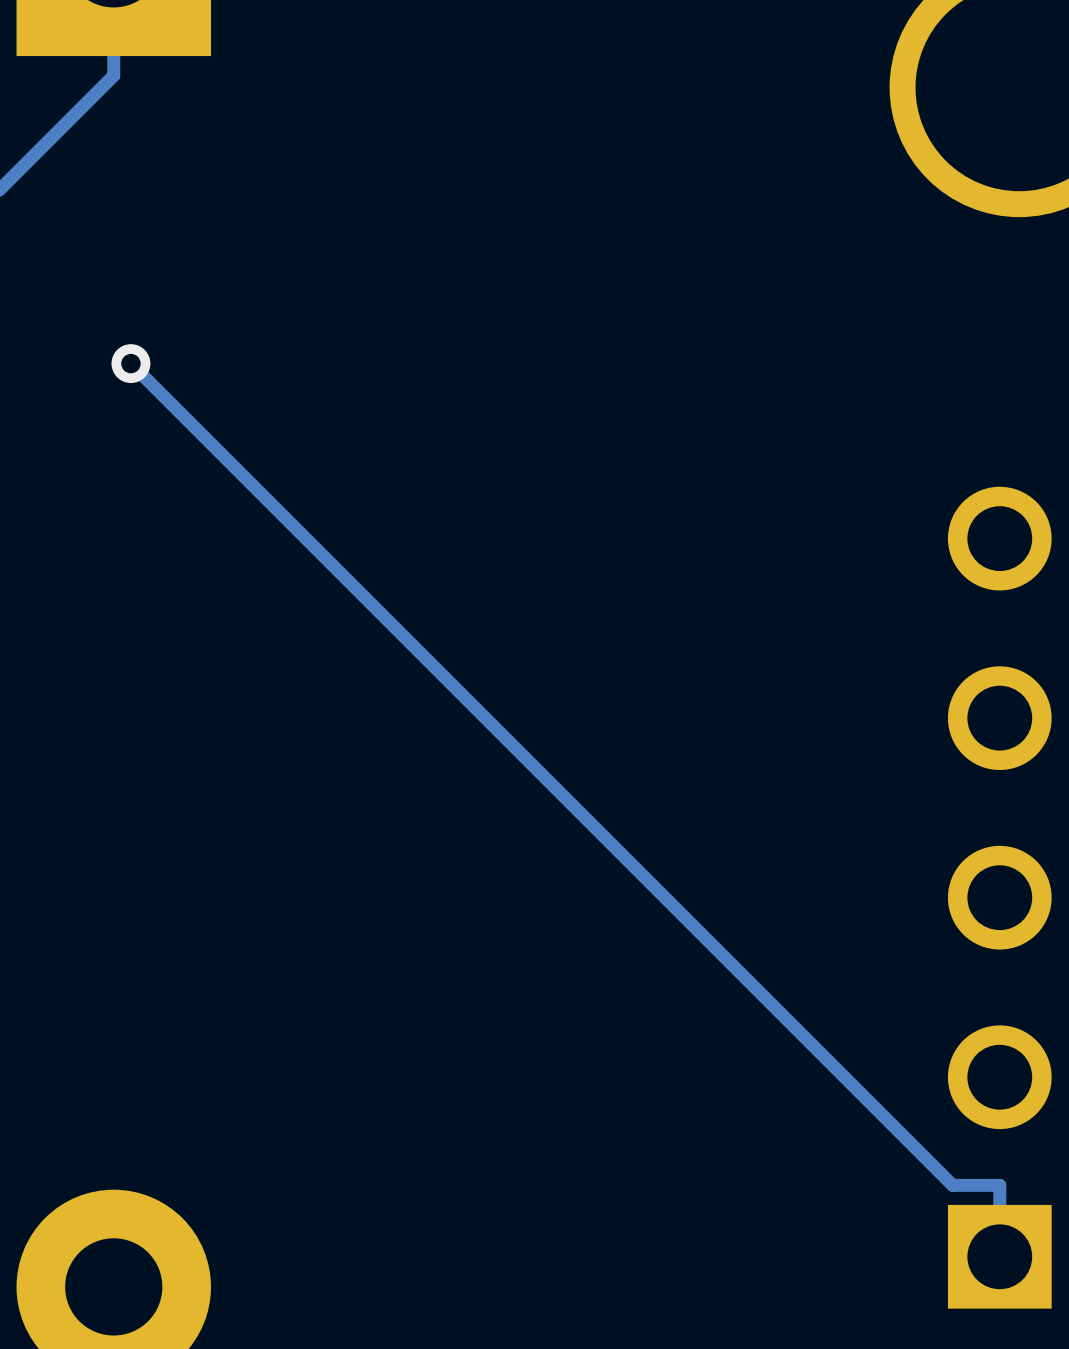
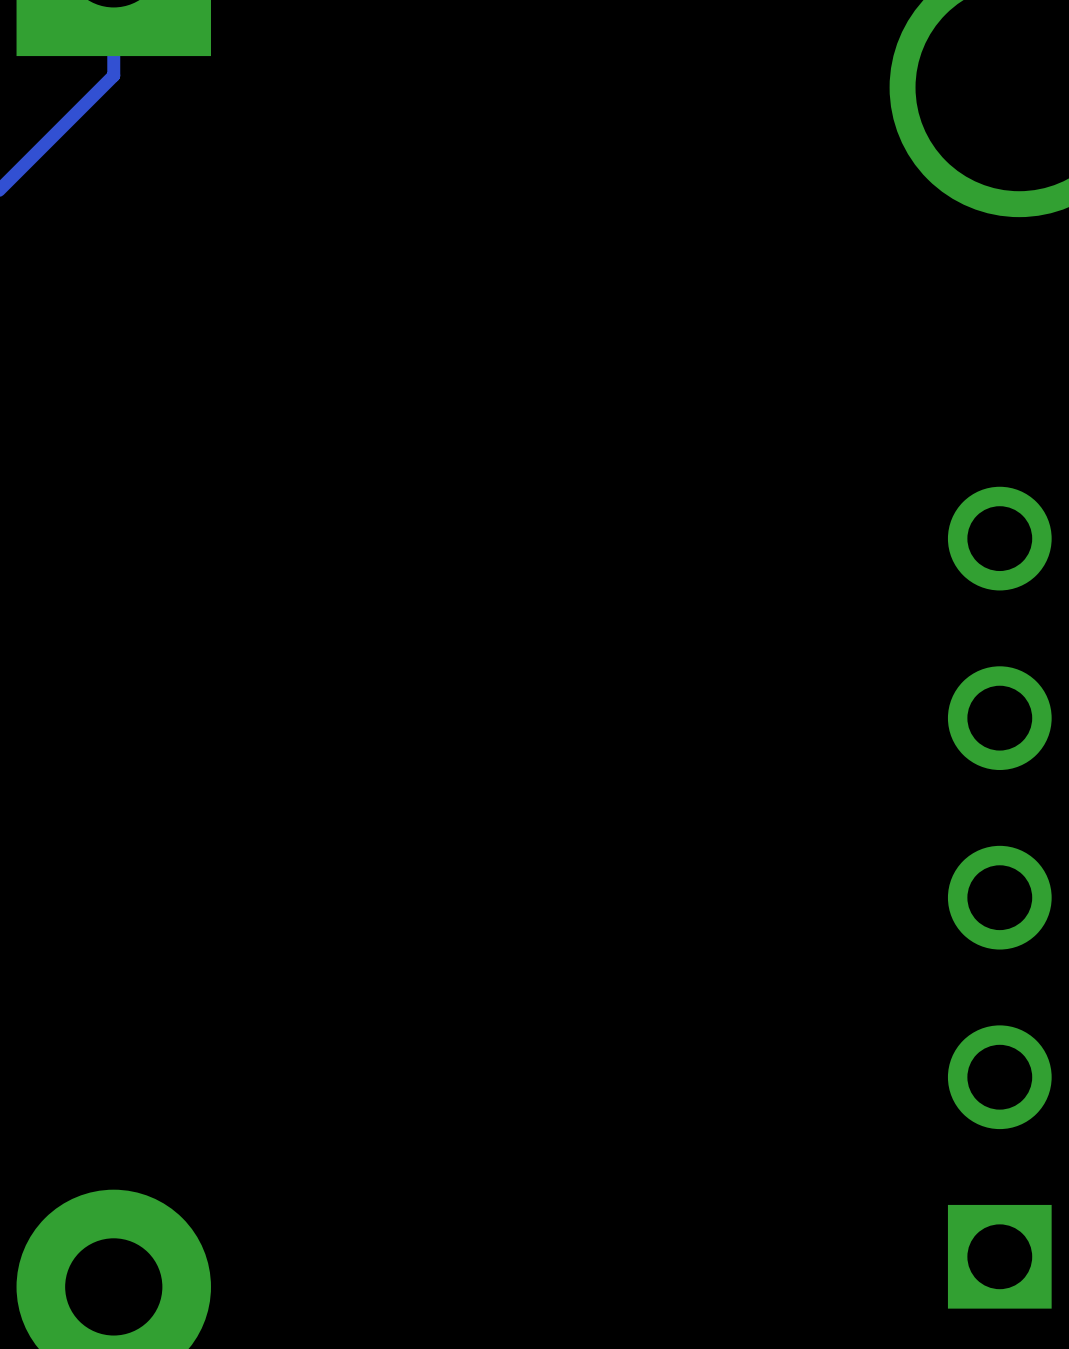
track: (130, 363) (952, 1185) (999, 1185) (999, 1256) -> none
via: (130, 363) -> none

